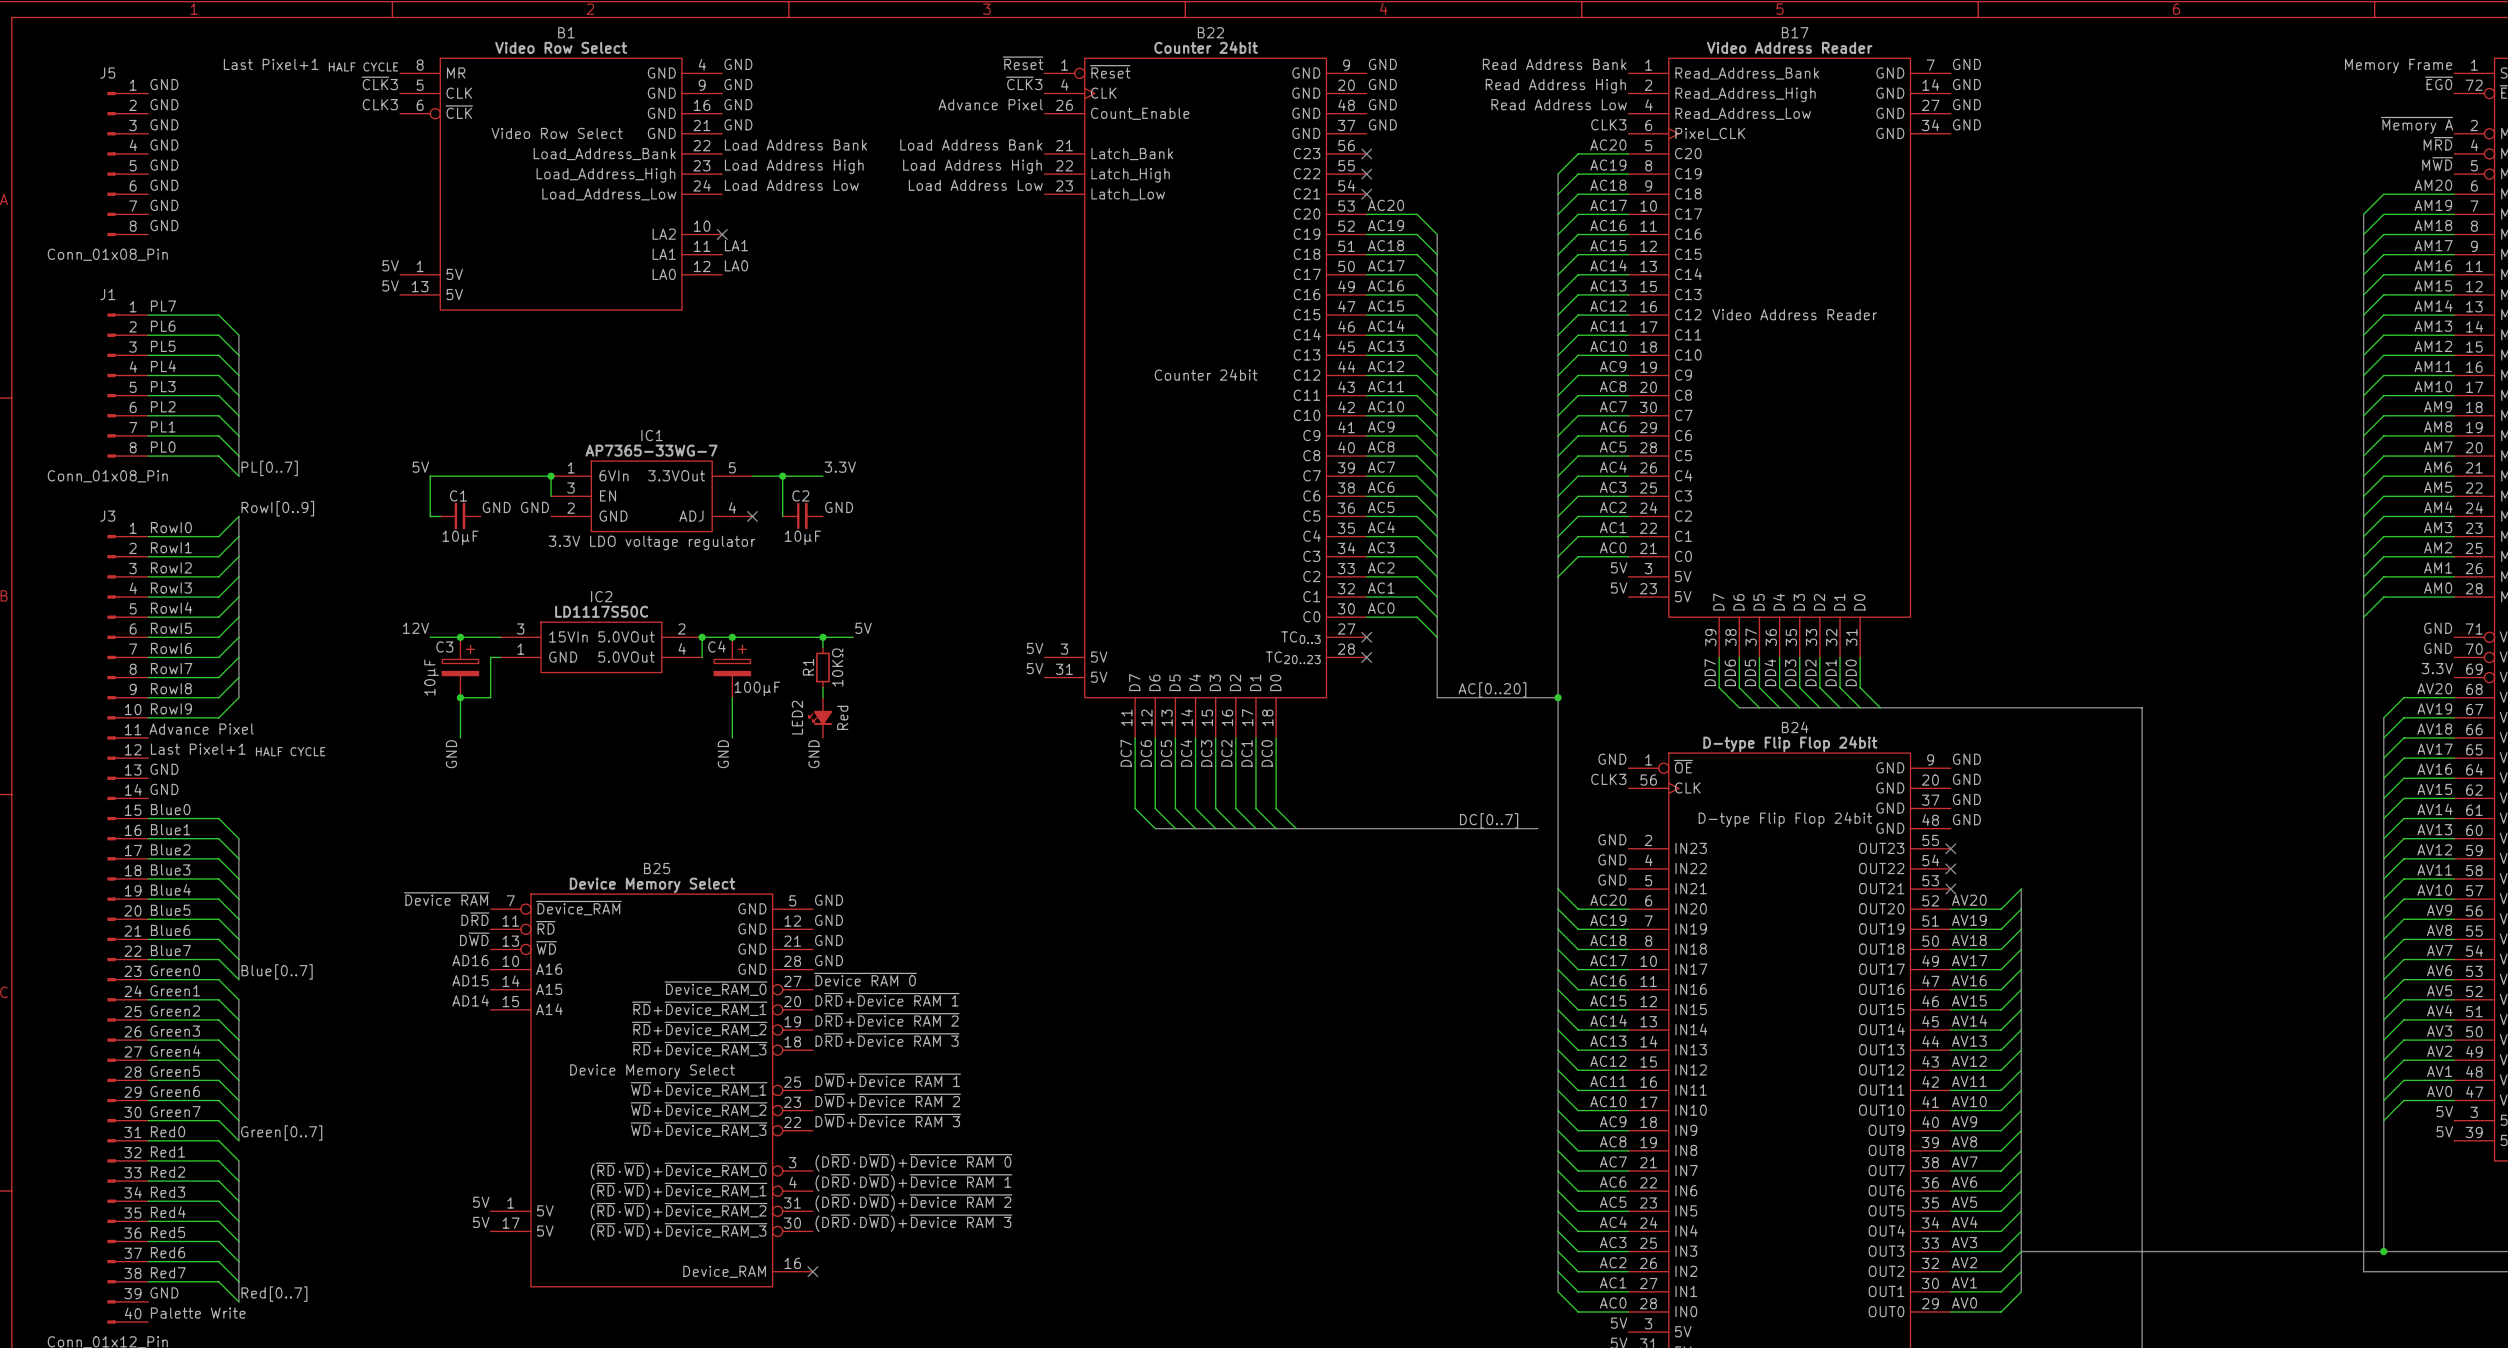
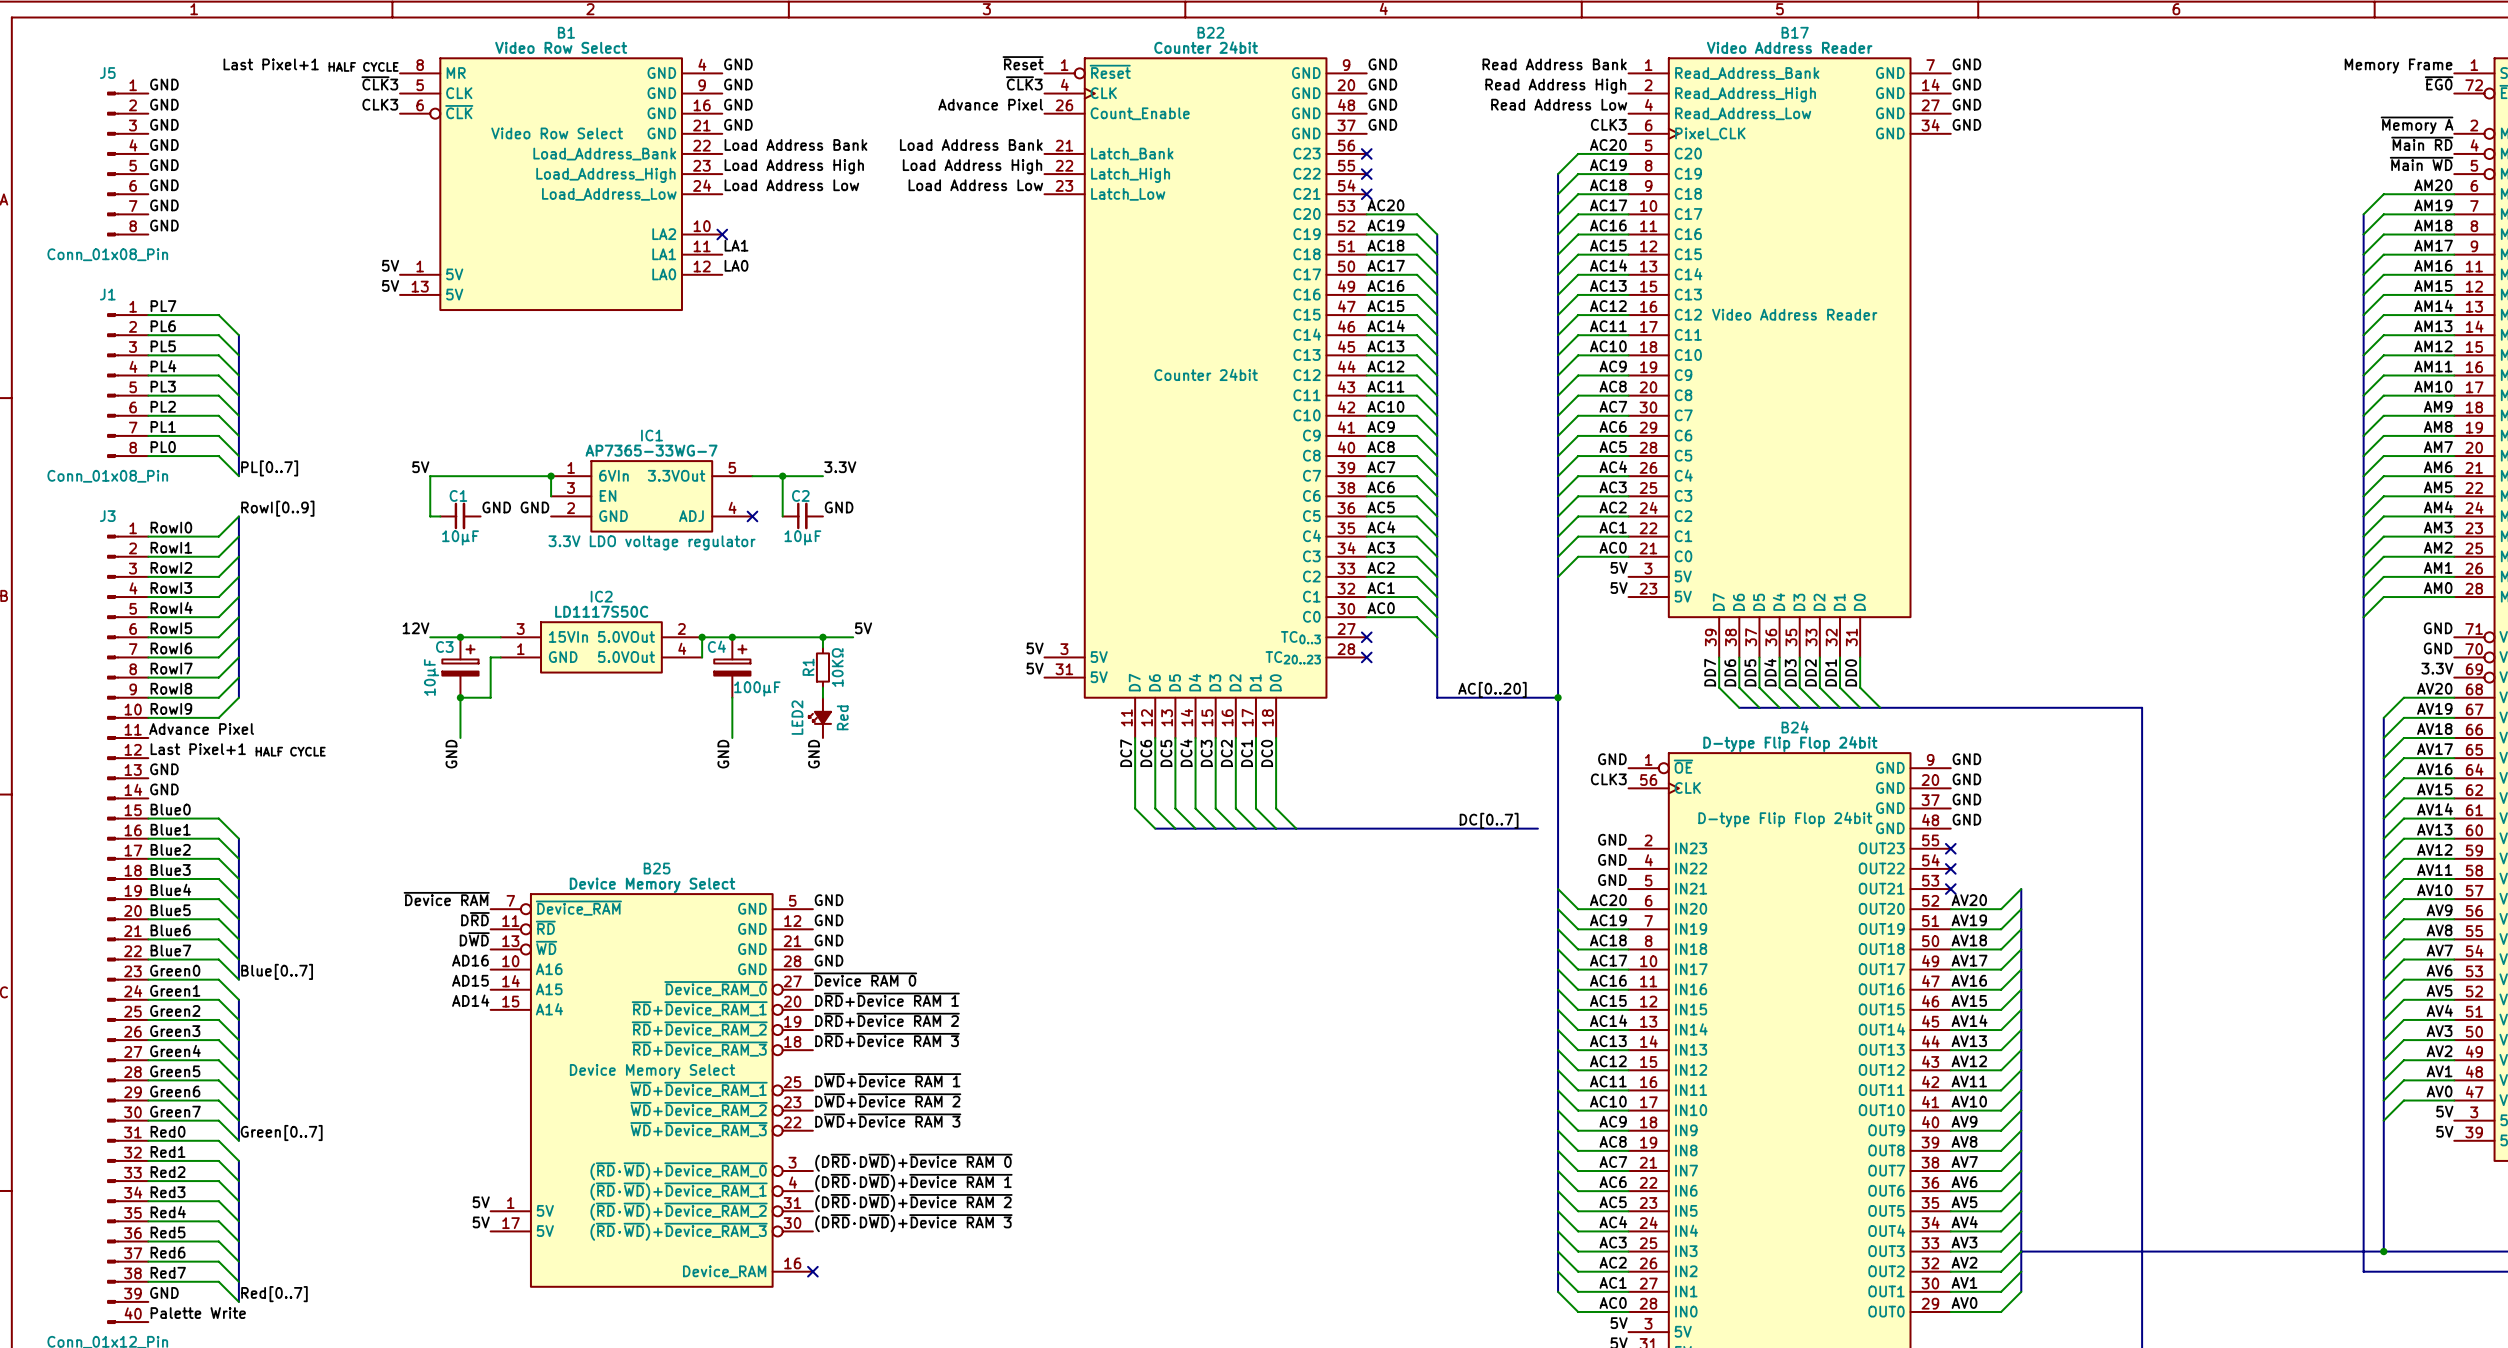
label: M~{RD} (2438, 143) -> ~{Main RD} (2422, 143)
label: M~{WD} (2437, 163) -> ~{Main WD} (2421, 163)

